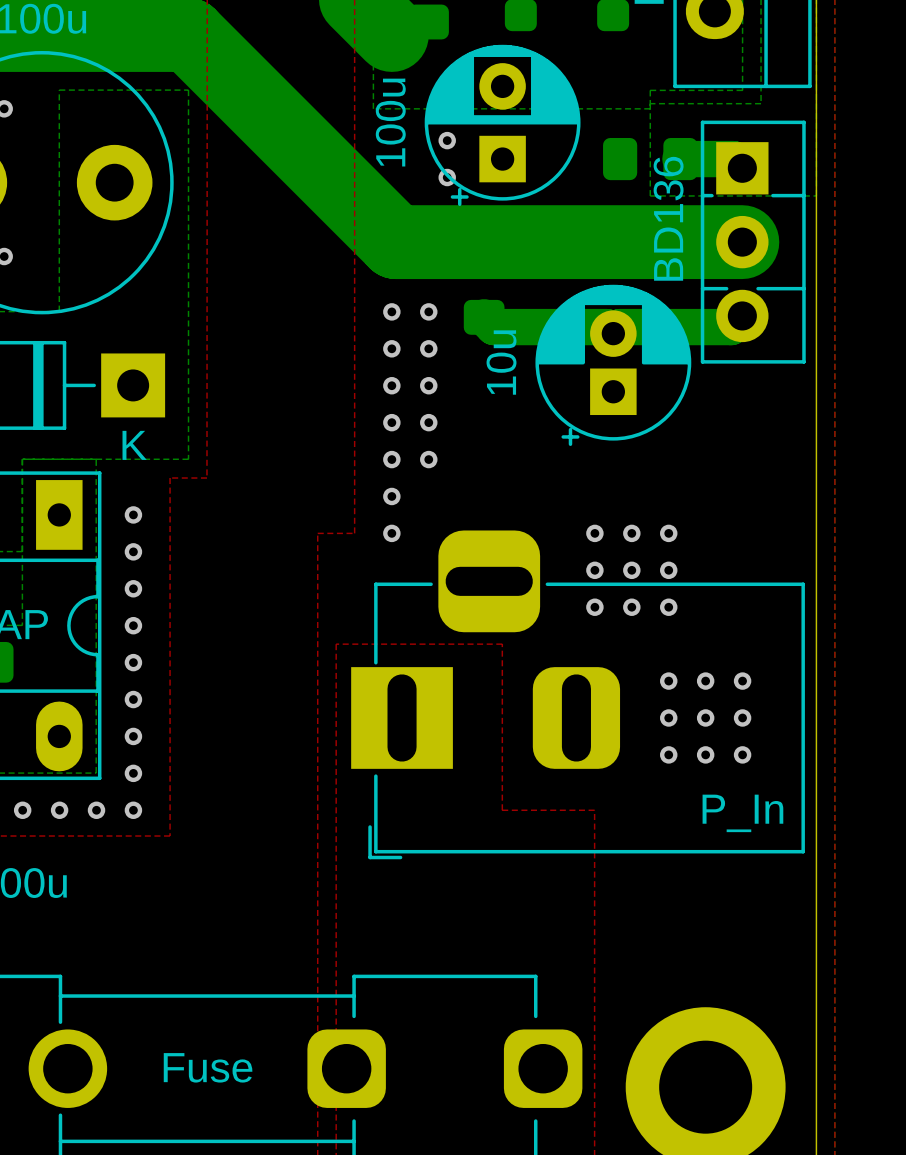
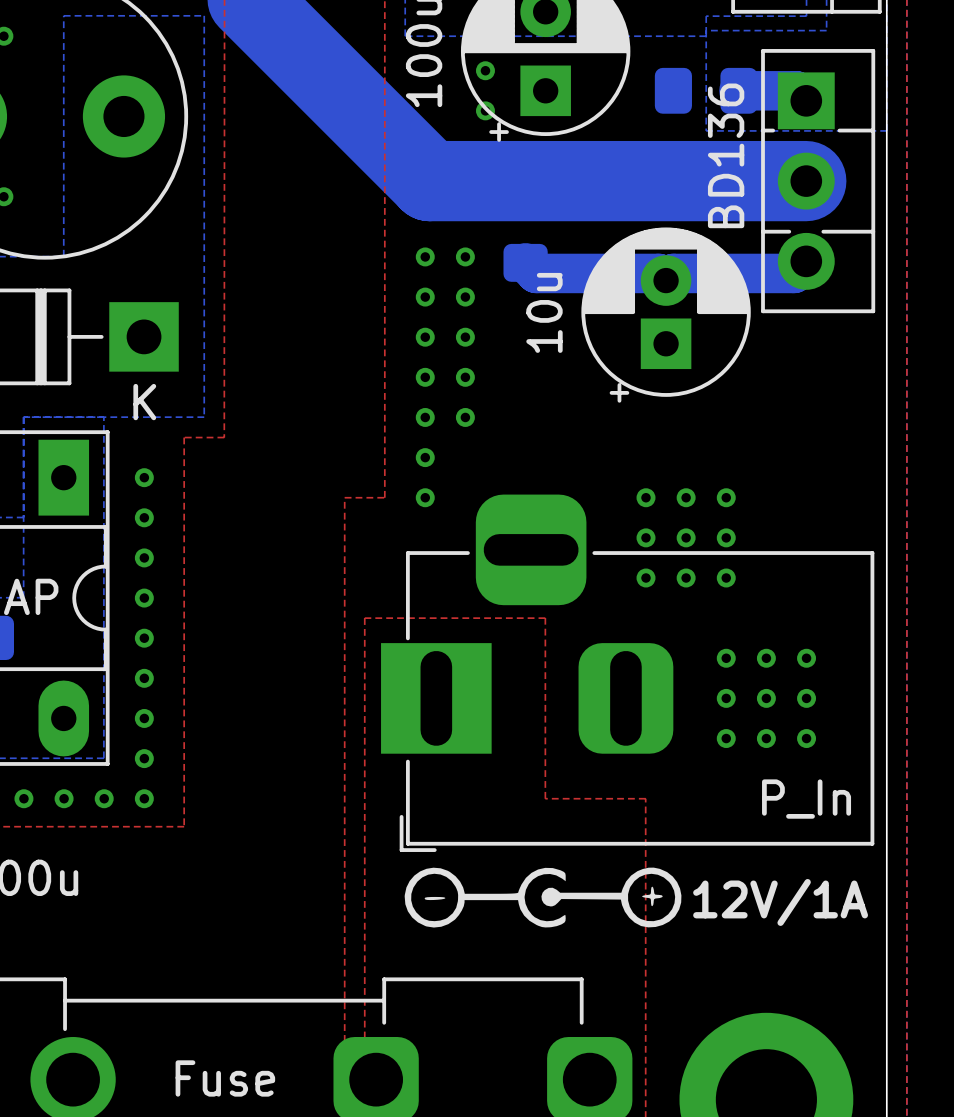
drawing: none -> [404, 867, 682, 928]
text: none -> 12V/1A (780, 902)

